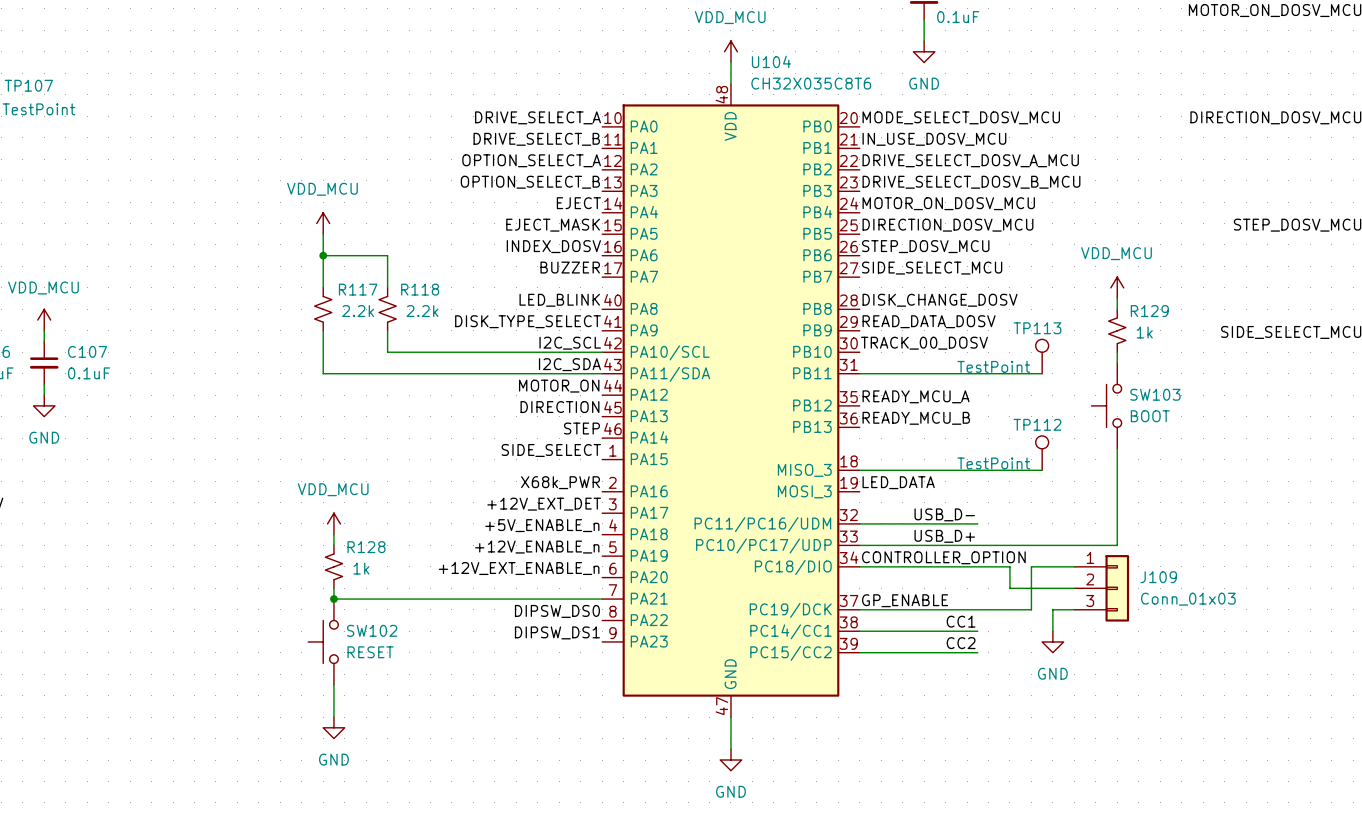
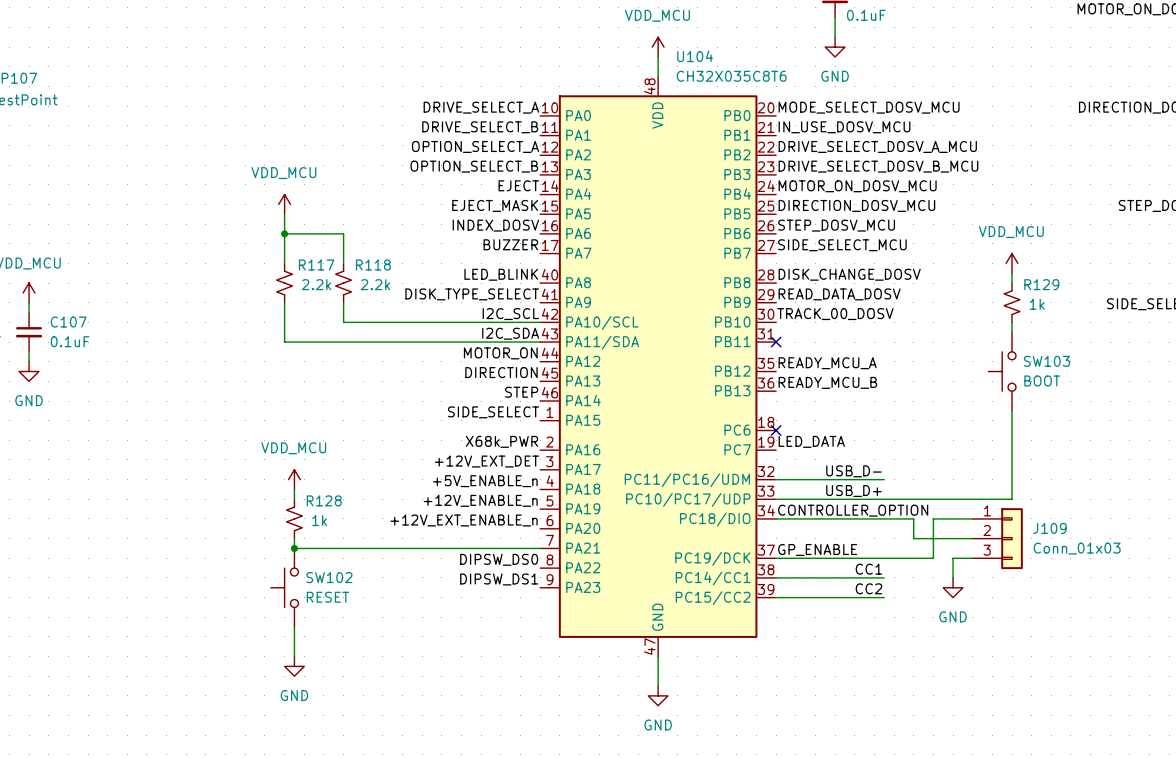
TP113: TestPoint (1042, 356) -> none
wire: (859, 373) (1042, 373) -> none
no-connect mark: none -> (776, 342)
TP112: TestPoint (1042, 453) -> none
U104 pin name: MISO_3 (804, 470) -> PC6 (737, 430)
wire: (859, 470) (1042, 470) -> none
no-connect mark: none -> (776, 430)
U104 pin name: MOSI_3 (804, 491) -> PC7 (737, 449)

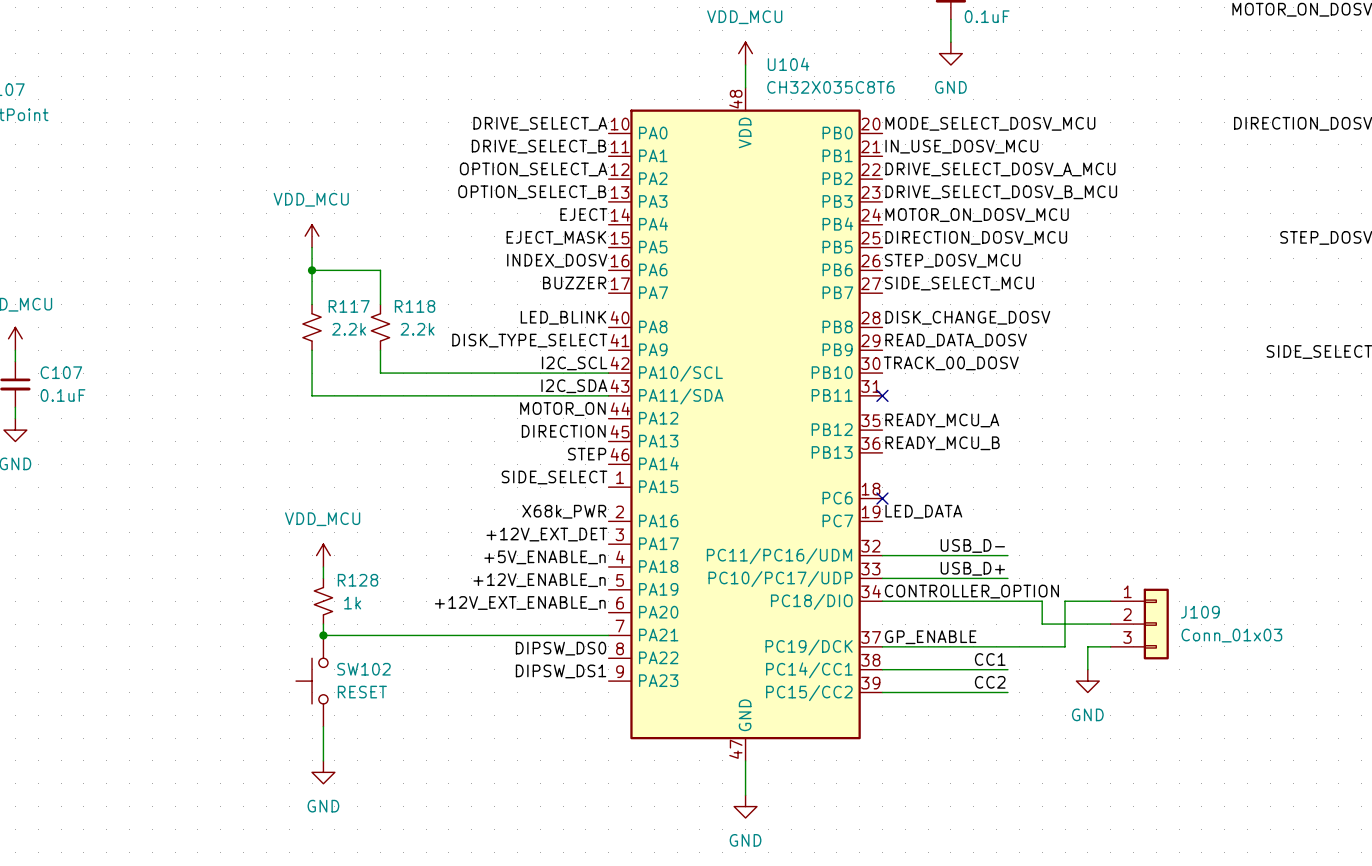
power symbol: VDD_MCU (1012, 263) -> none
wire: (1012, 273) (1012, 283) -> none
R129: 1k (1012, 302) -> none
wire: (1012, 322) (1012, 332) -> none
SW103: BOOT (1002, 371) -> none
wire: (1012, 410) (1012, 499) (884, 499) -> none

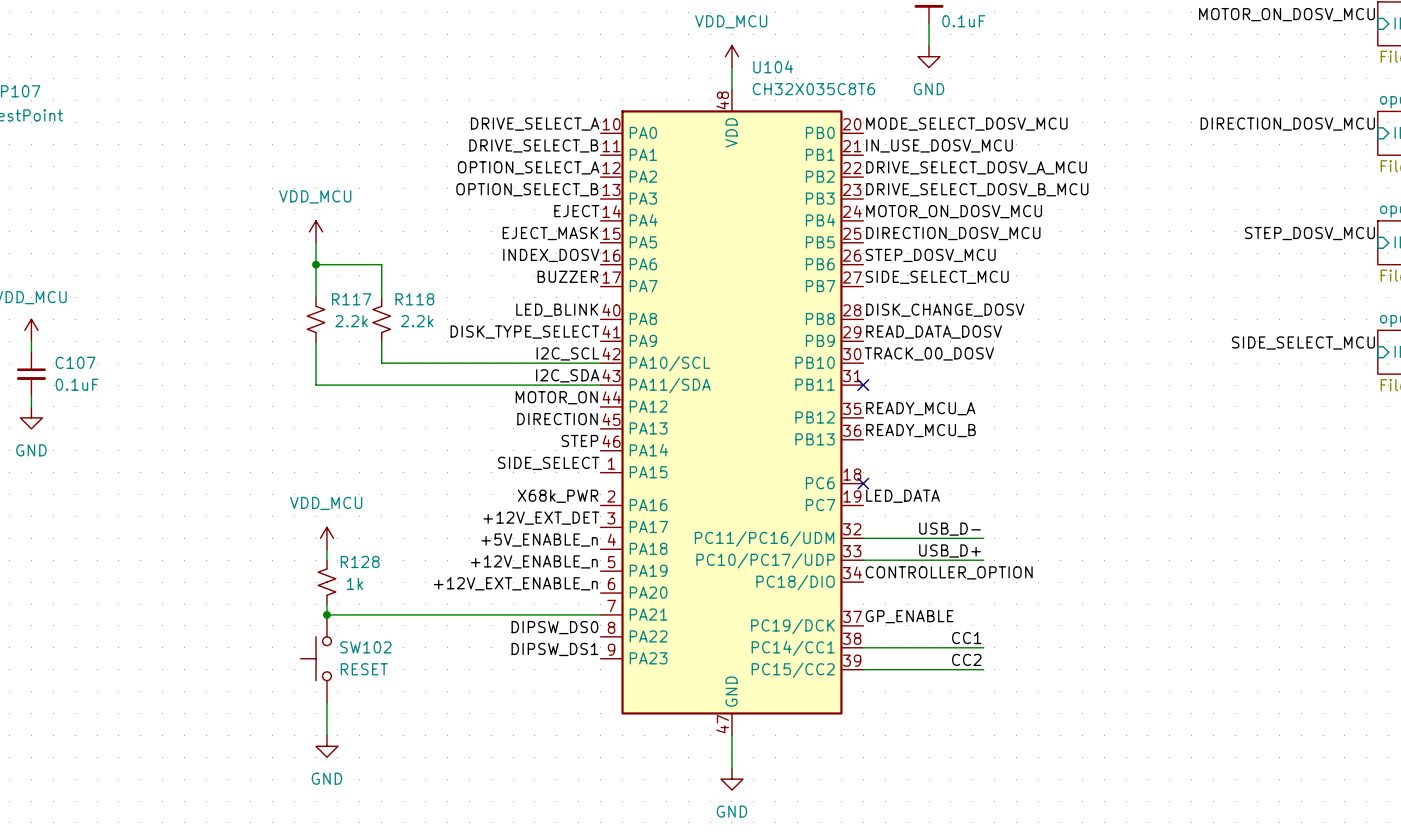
wire: (882, 601) (1042, 601) (1042, 624) (1110, 624) -> none
wire: (1110, 601) (1065, 601) (1065, 646) (882, 646) -> none
J109: Conn_01x03 (1139, 624) -> none
wire: (1110, 646) (1087, 646) (1087, 669) -> none
power symbol: GND (1087, 681) -> none

